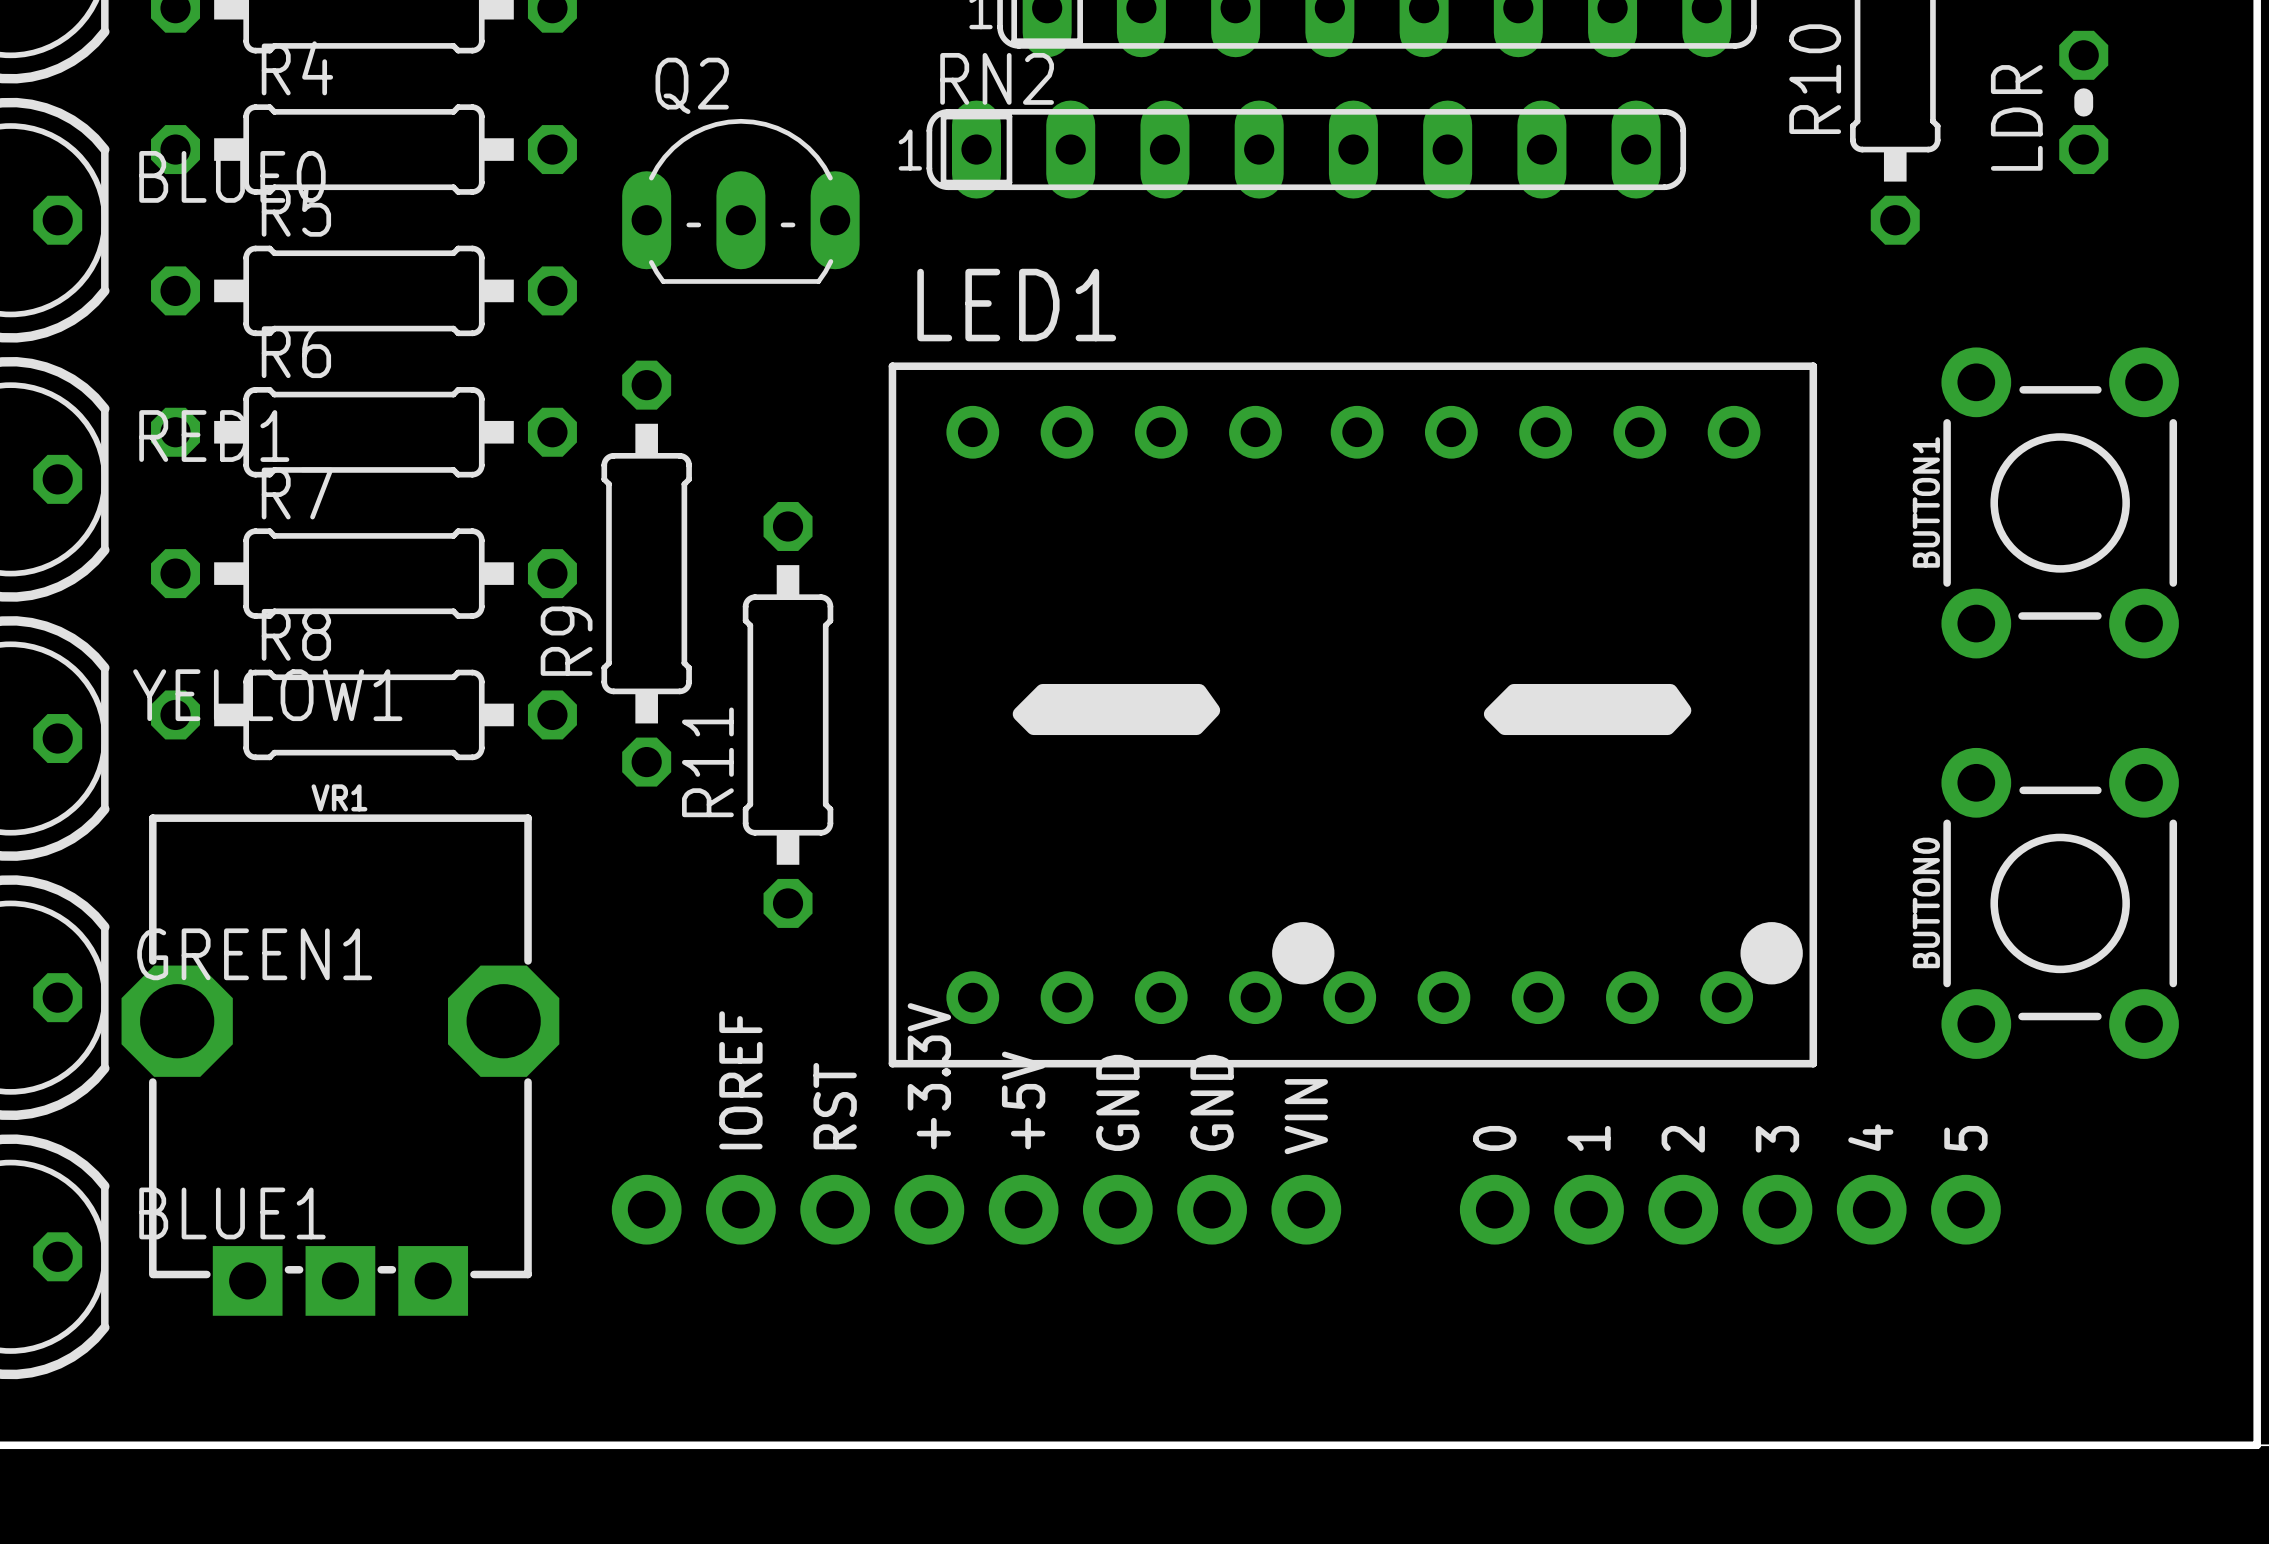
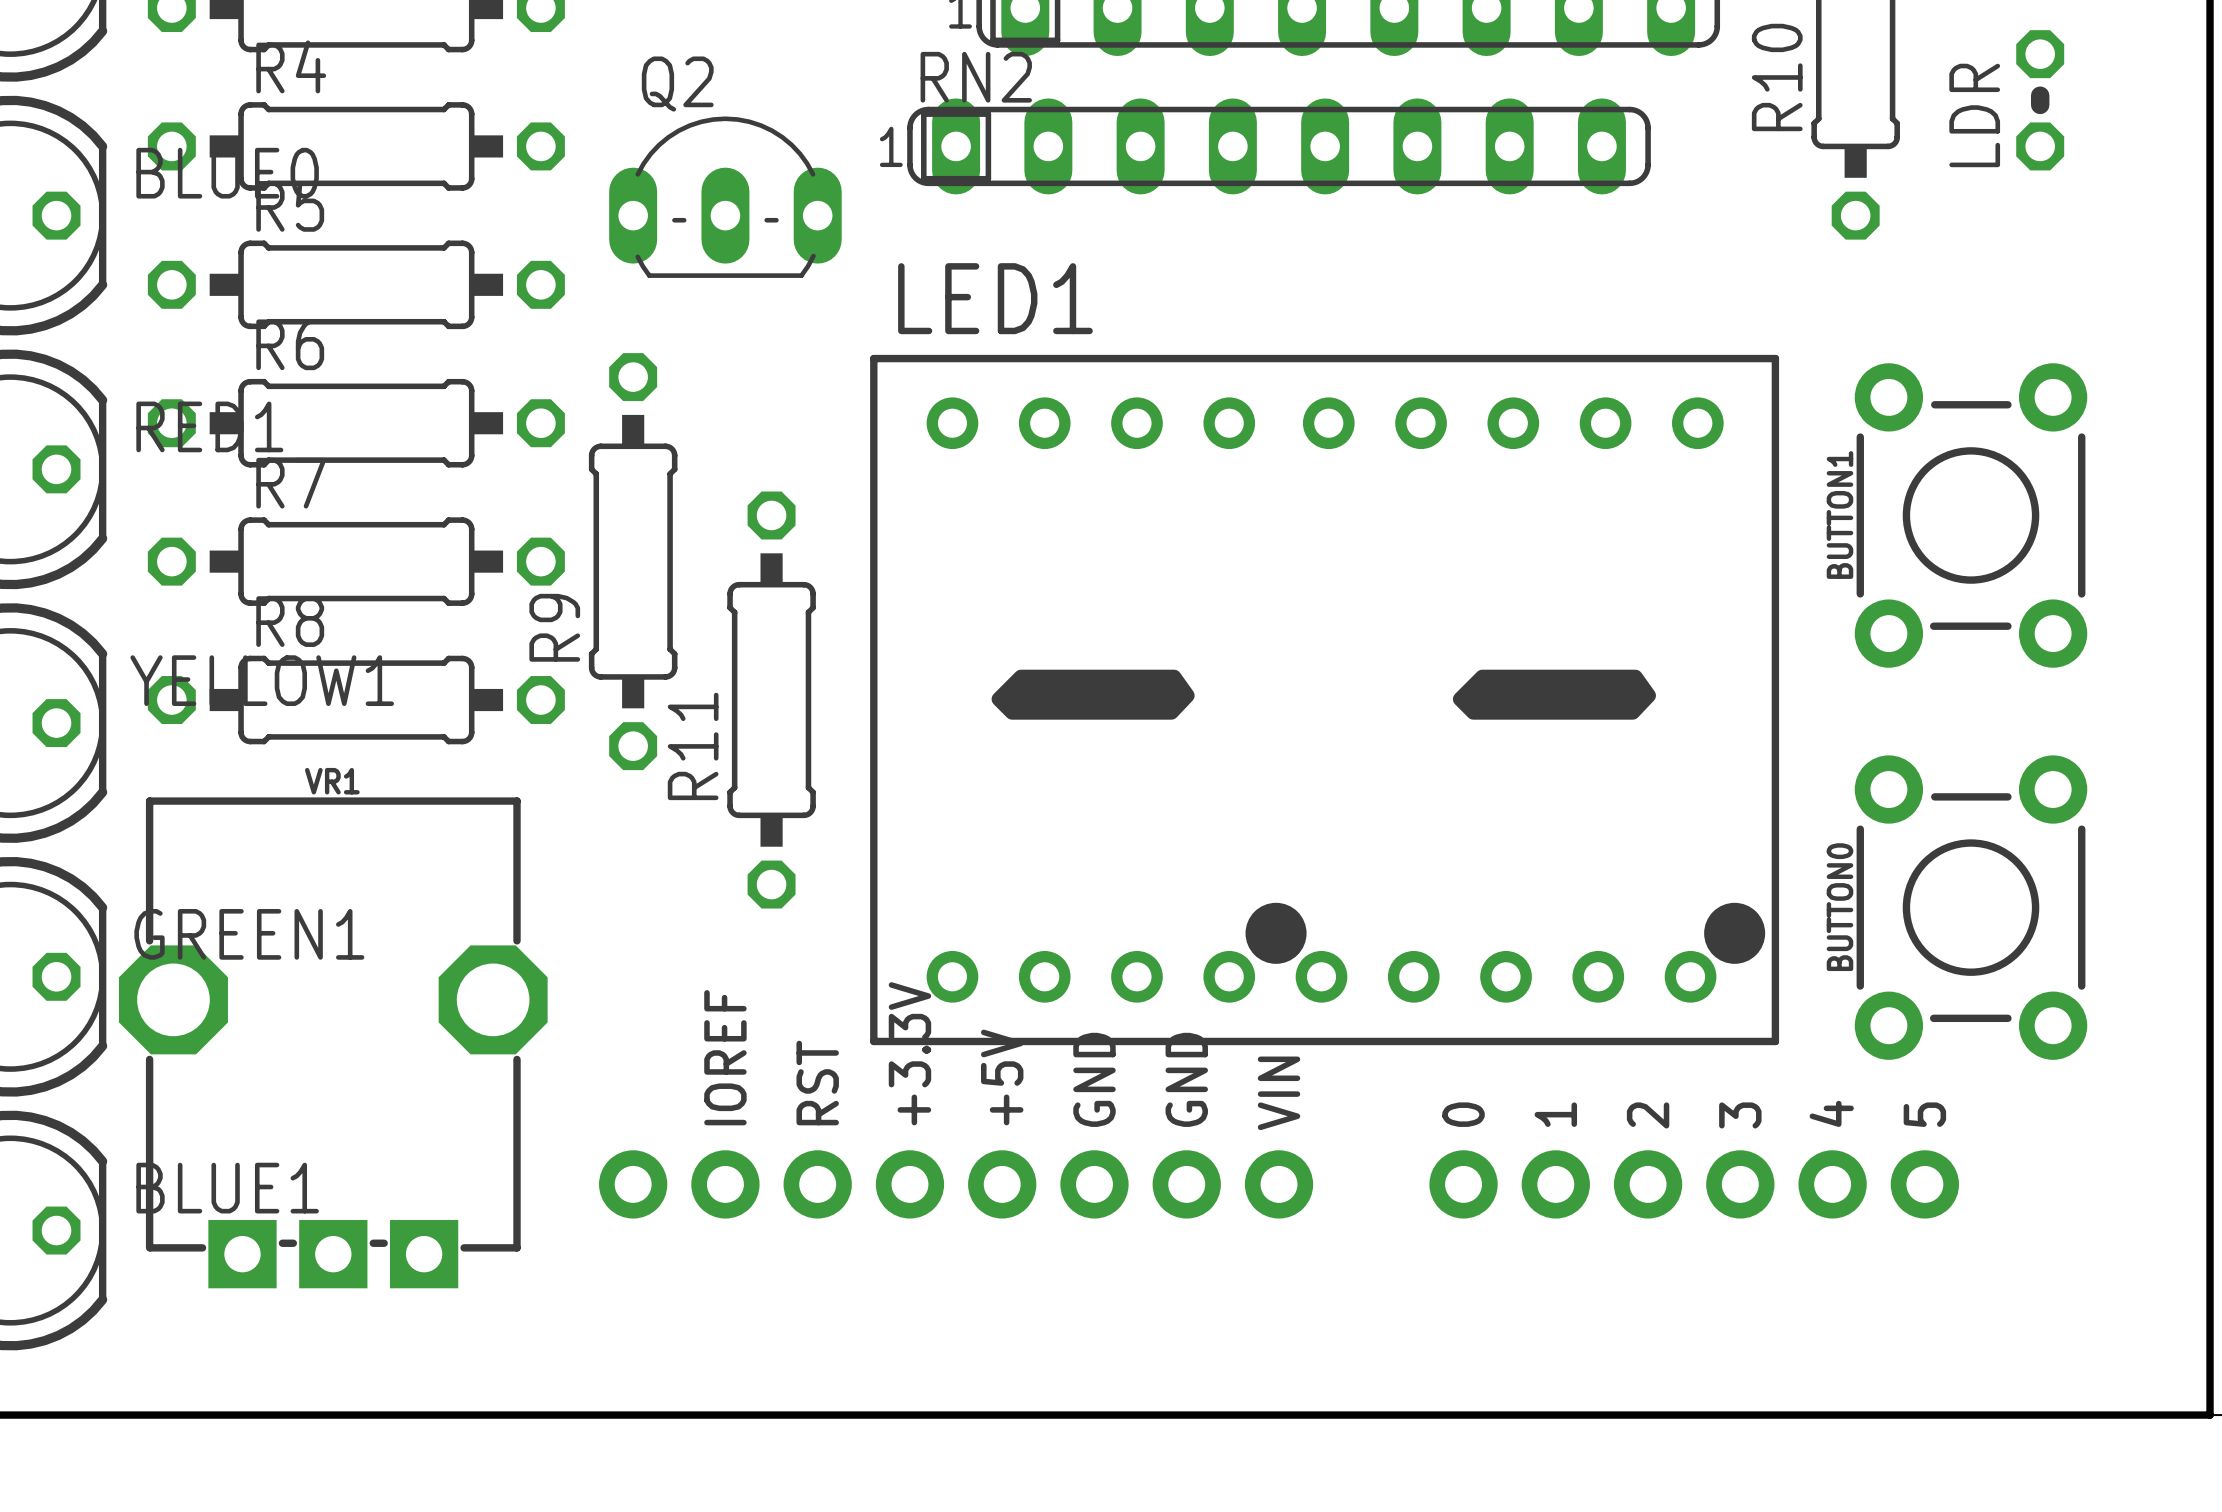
BUTTON1 position: (2060, 502) -> (1971, 515)
BUTTON0 position: (2060, 903) -> (1971, 907)

